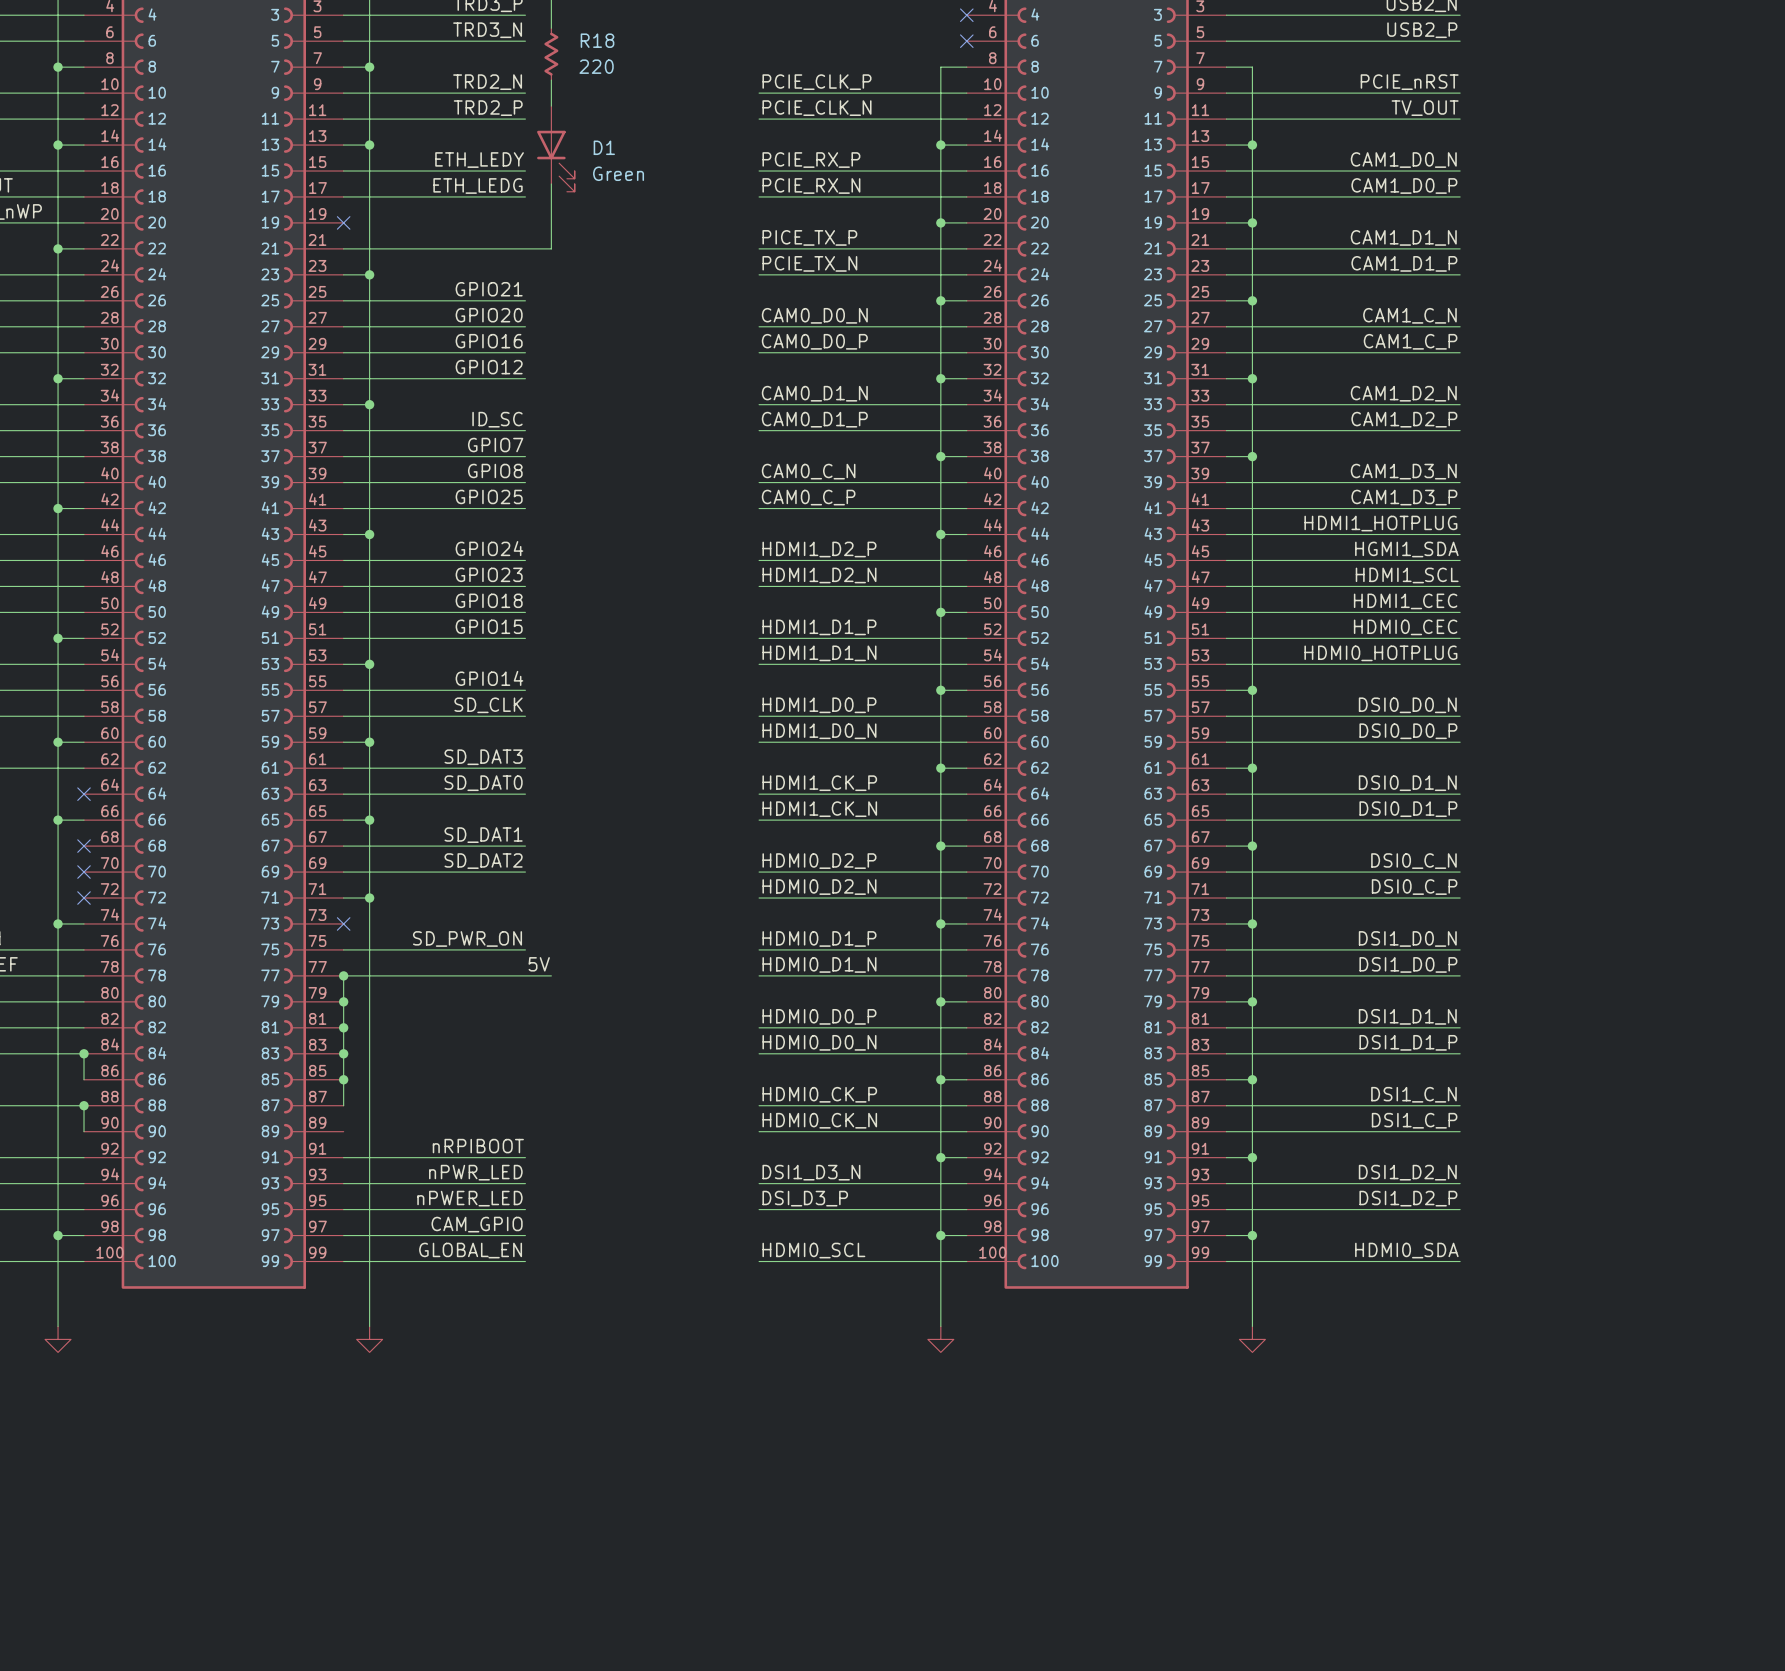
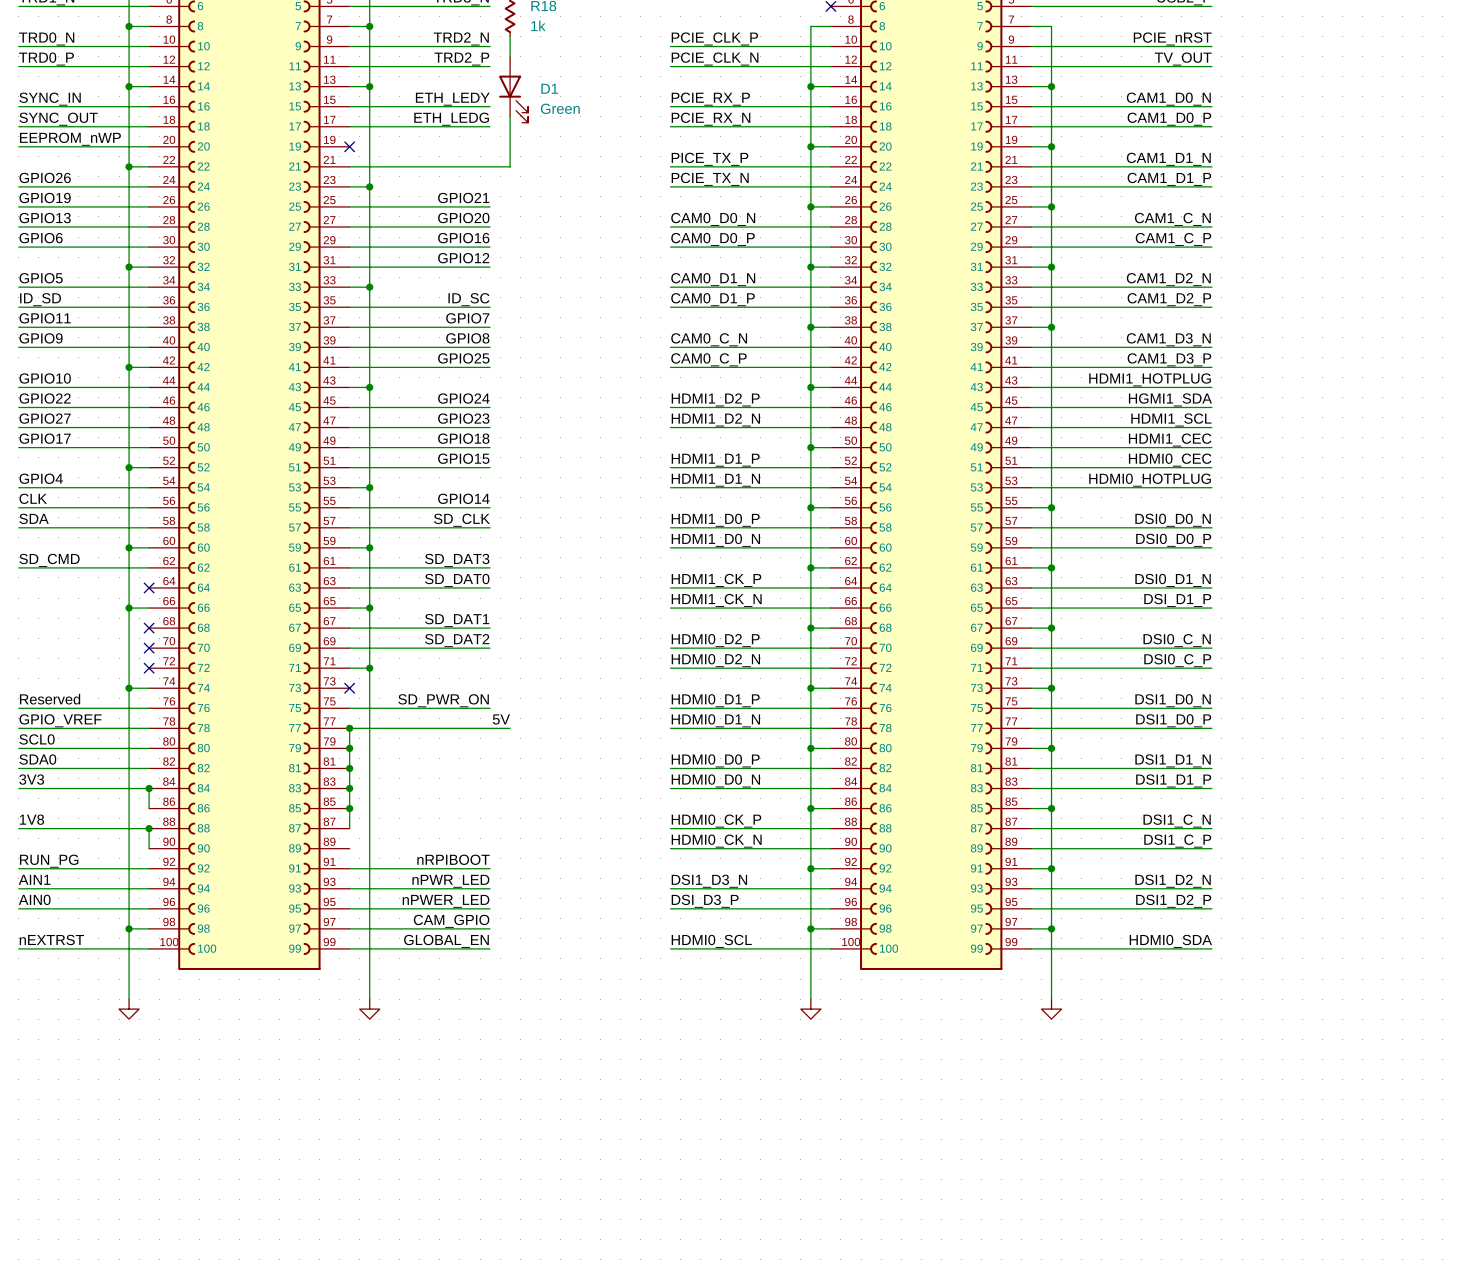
R18 value: 220 (596, 66) -> 1k (538, 25)
label: DSI0_D1_P (1408, 809) -> DSI_D1_P (1177, 600)

